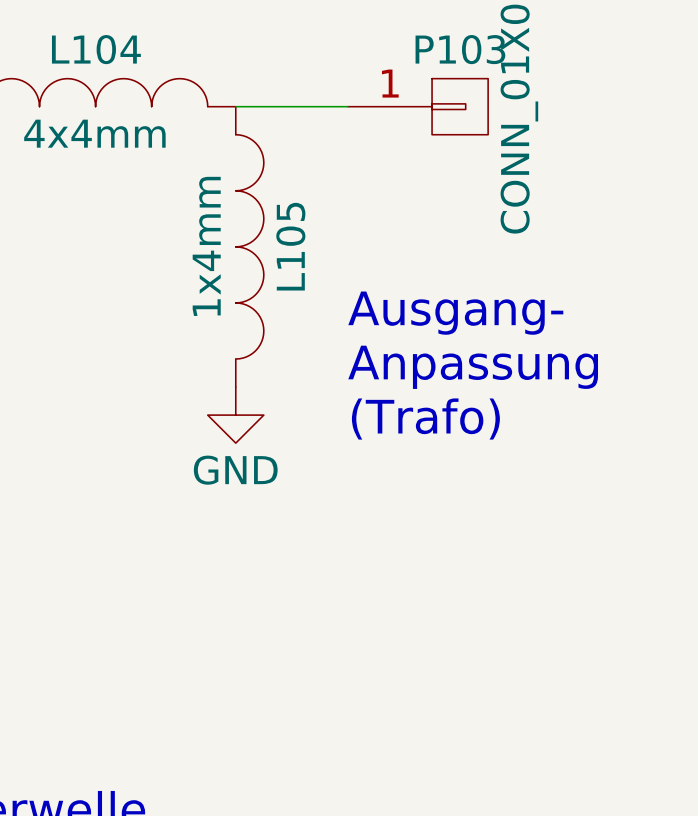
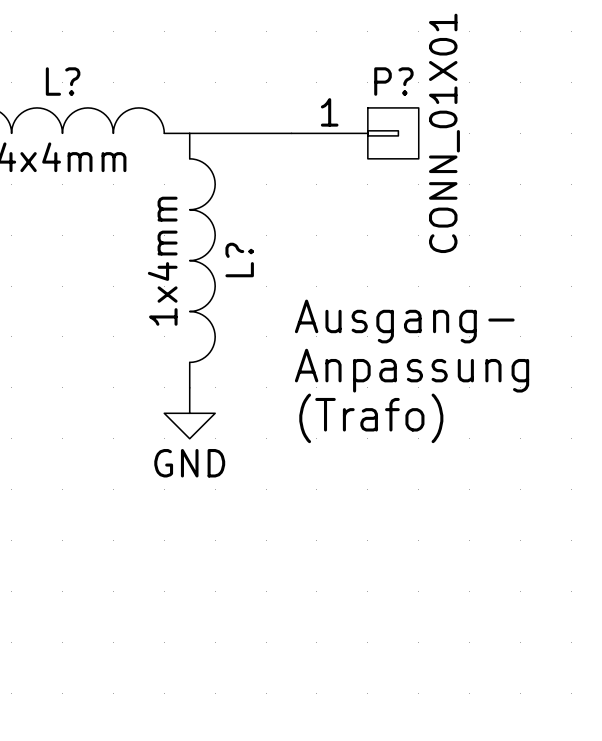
L104 name: L104 (96, 49) -> L? (63, 81)
P103 name: P103 (460, 49) -> P? (393, 81)
L105 name: L105 (290, 246) -> L? (239, 260)

